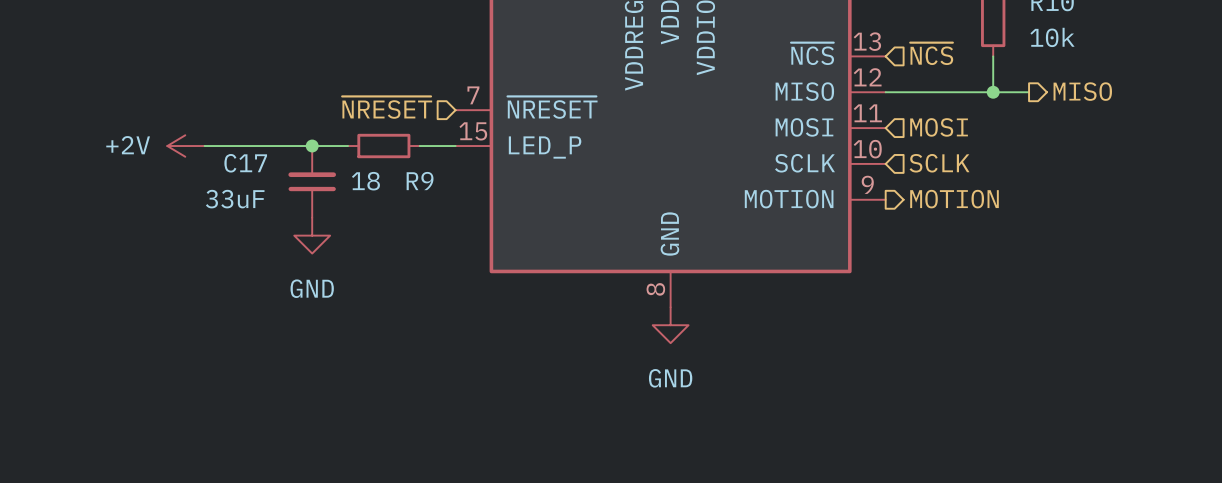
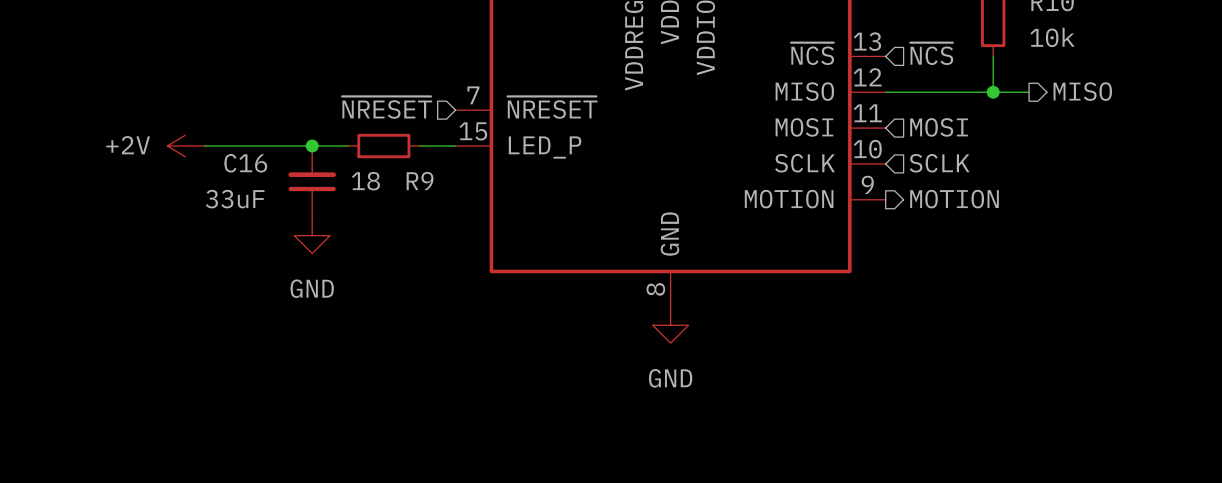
C17 name: C17 (245, 163) -> C16 (245, 163)

